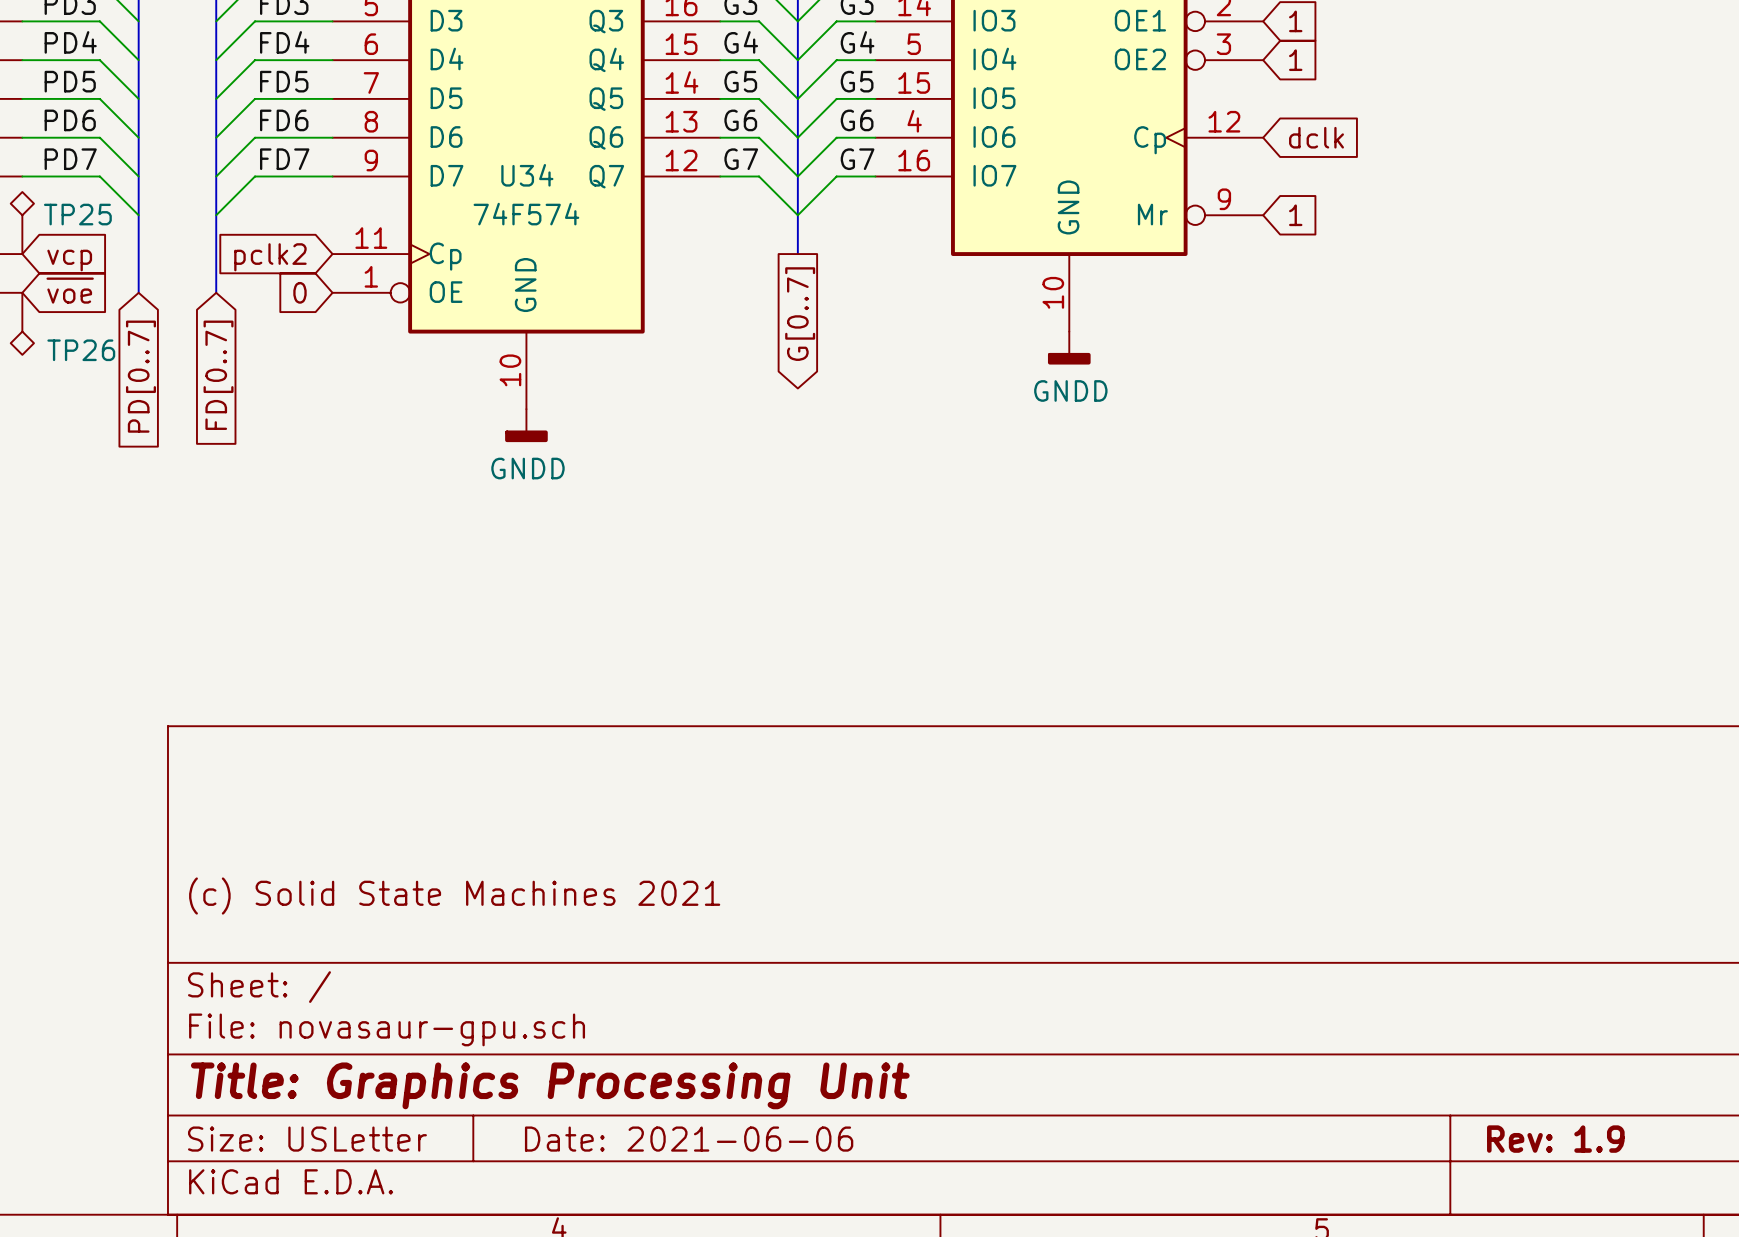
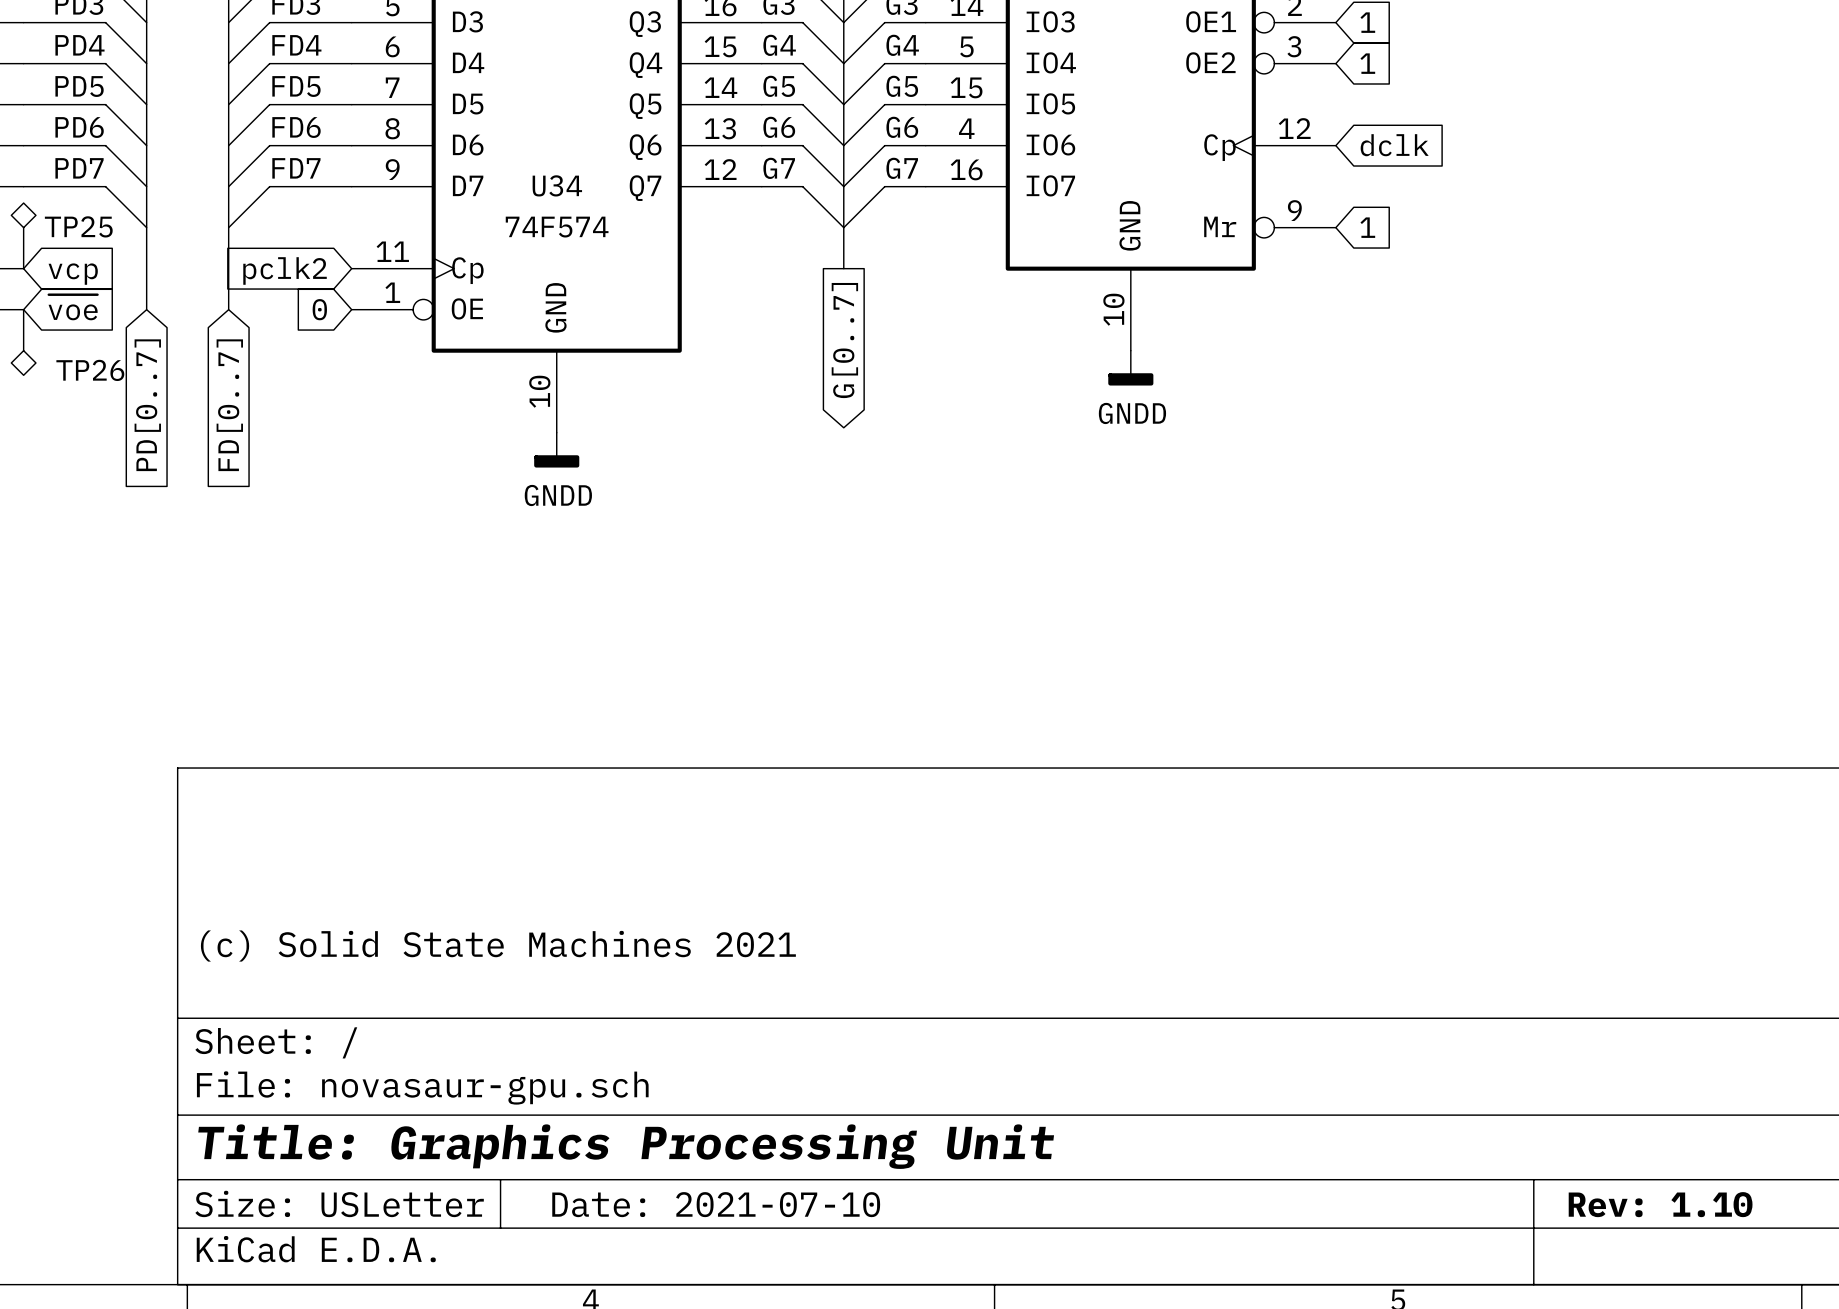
title block: Date: 2021-06-06 (689, 1139) -> Date: 2021-07-10 (716, 1204)
title block: Rev: 1.9 (1555, 1139) -> Rev: 1.10 (1660, 1204)

